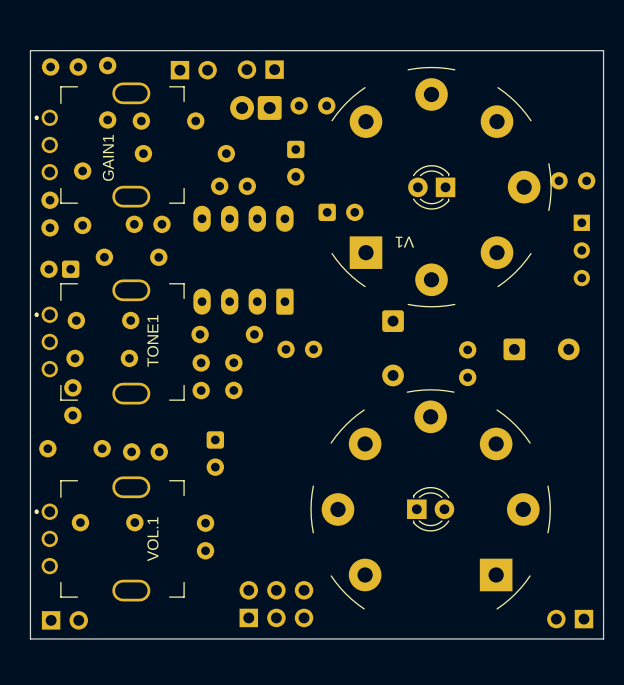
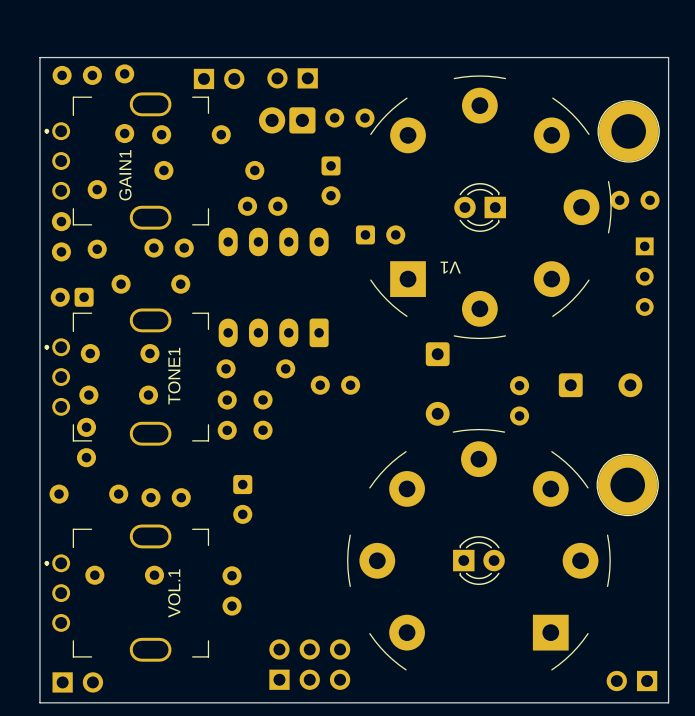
part: none -> (628, 131)
part: none -> (627, 484)

